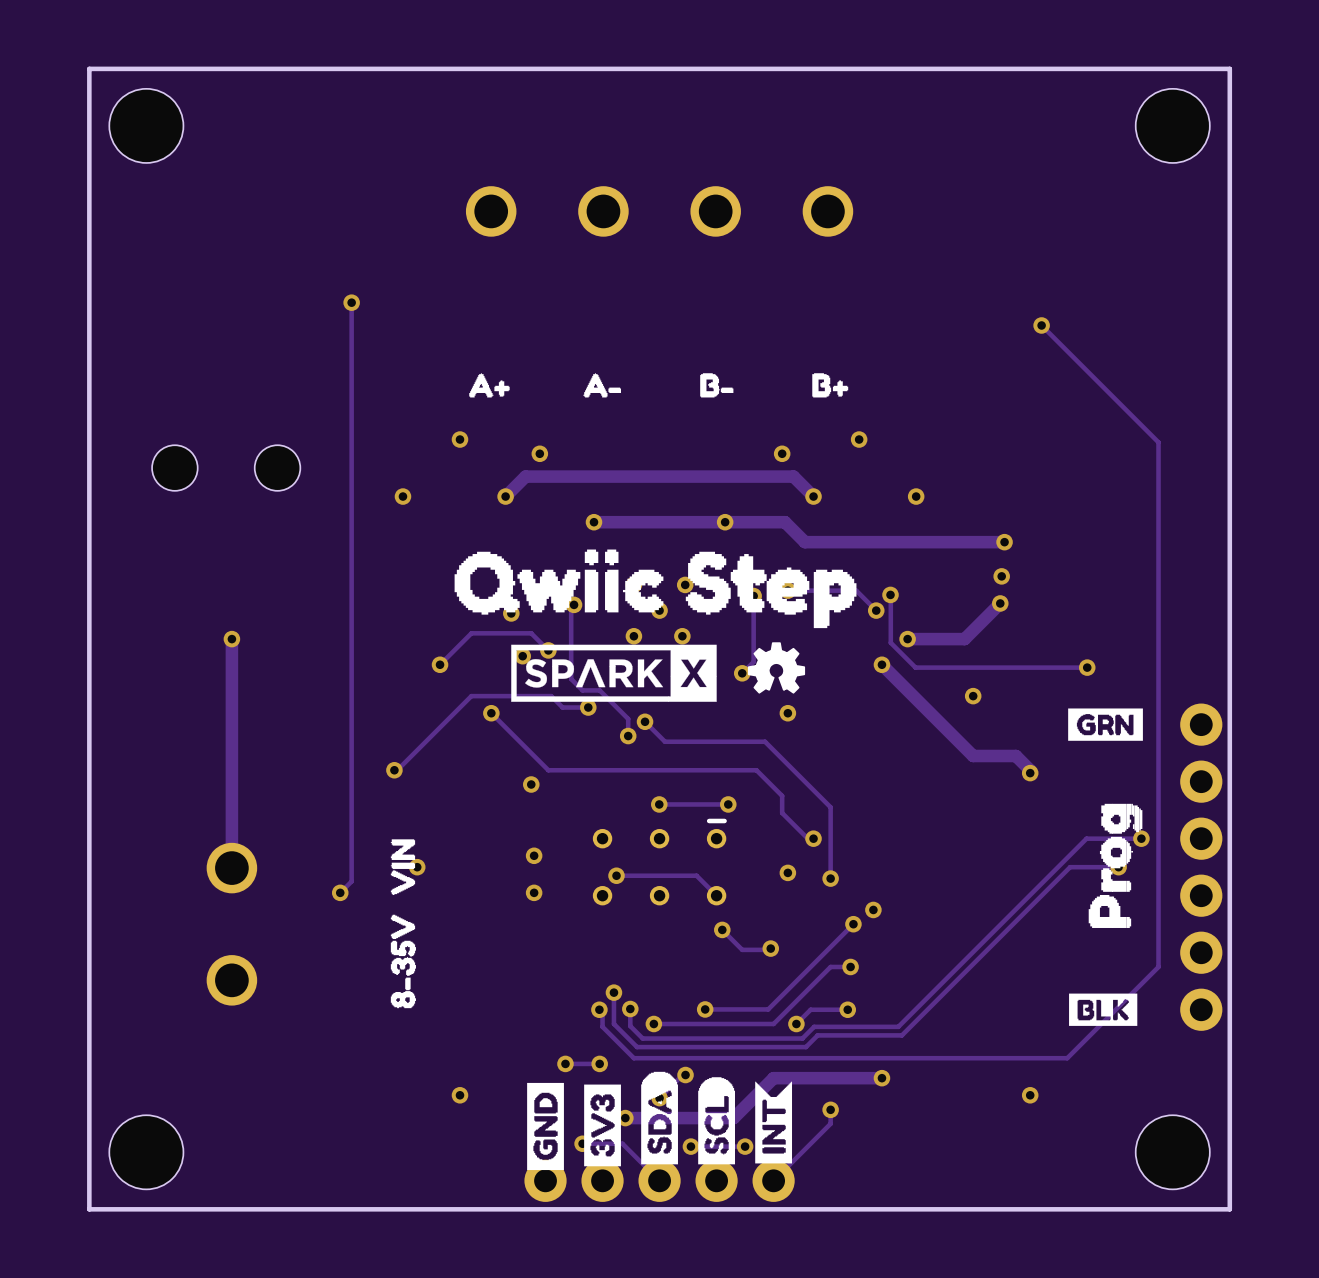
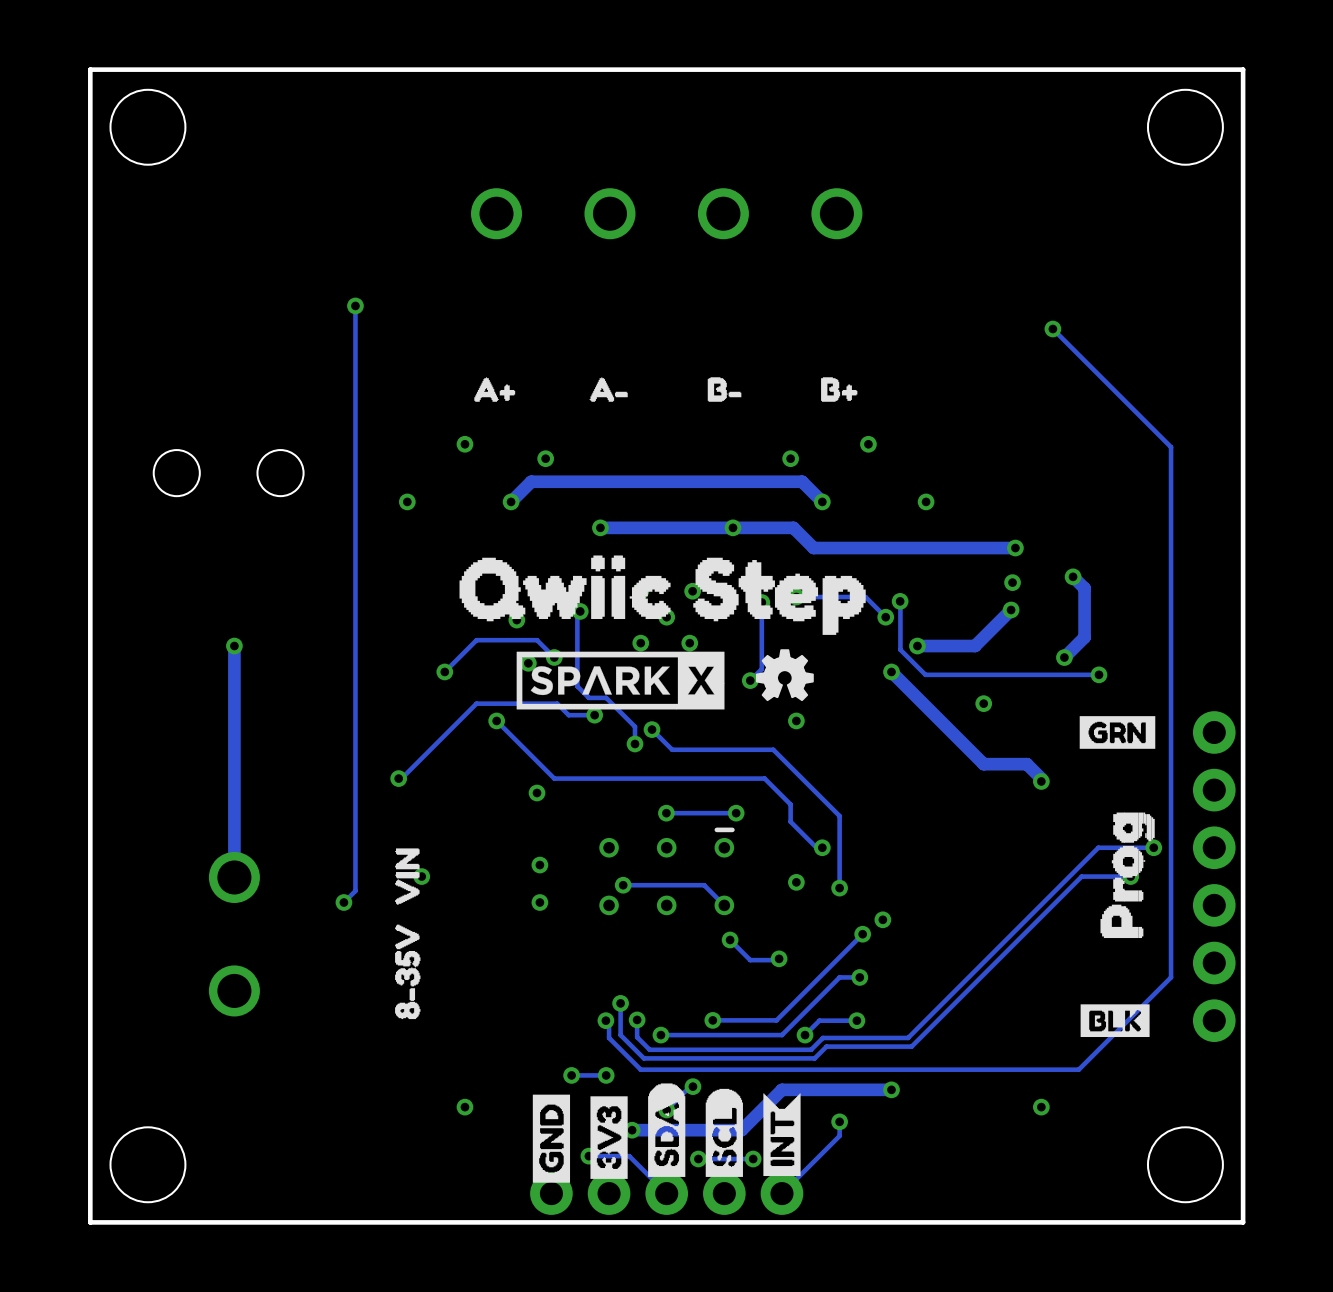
track: none -> (1073, 576) (1084, 588) (1084, 637) (1064, 657)
via: none -> (1073, 576)
via: none -> (1064, 657)

